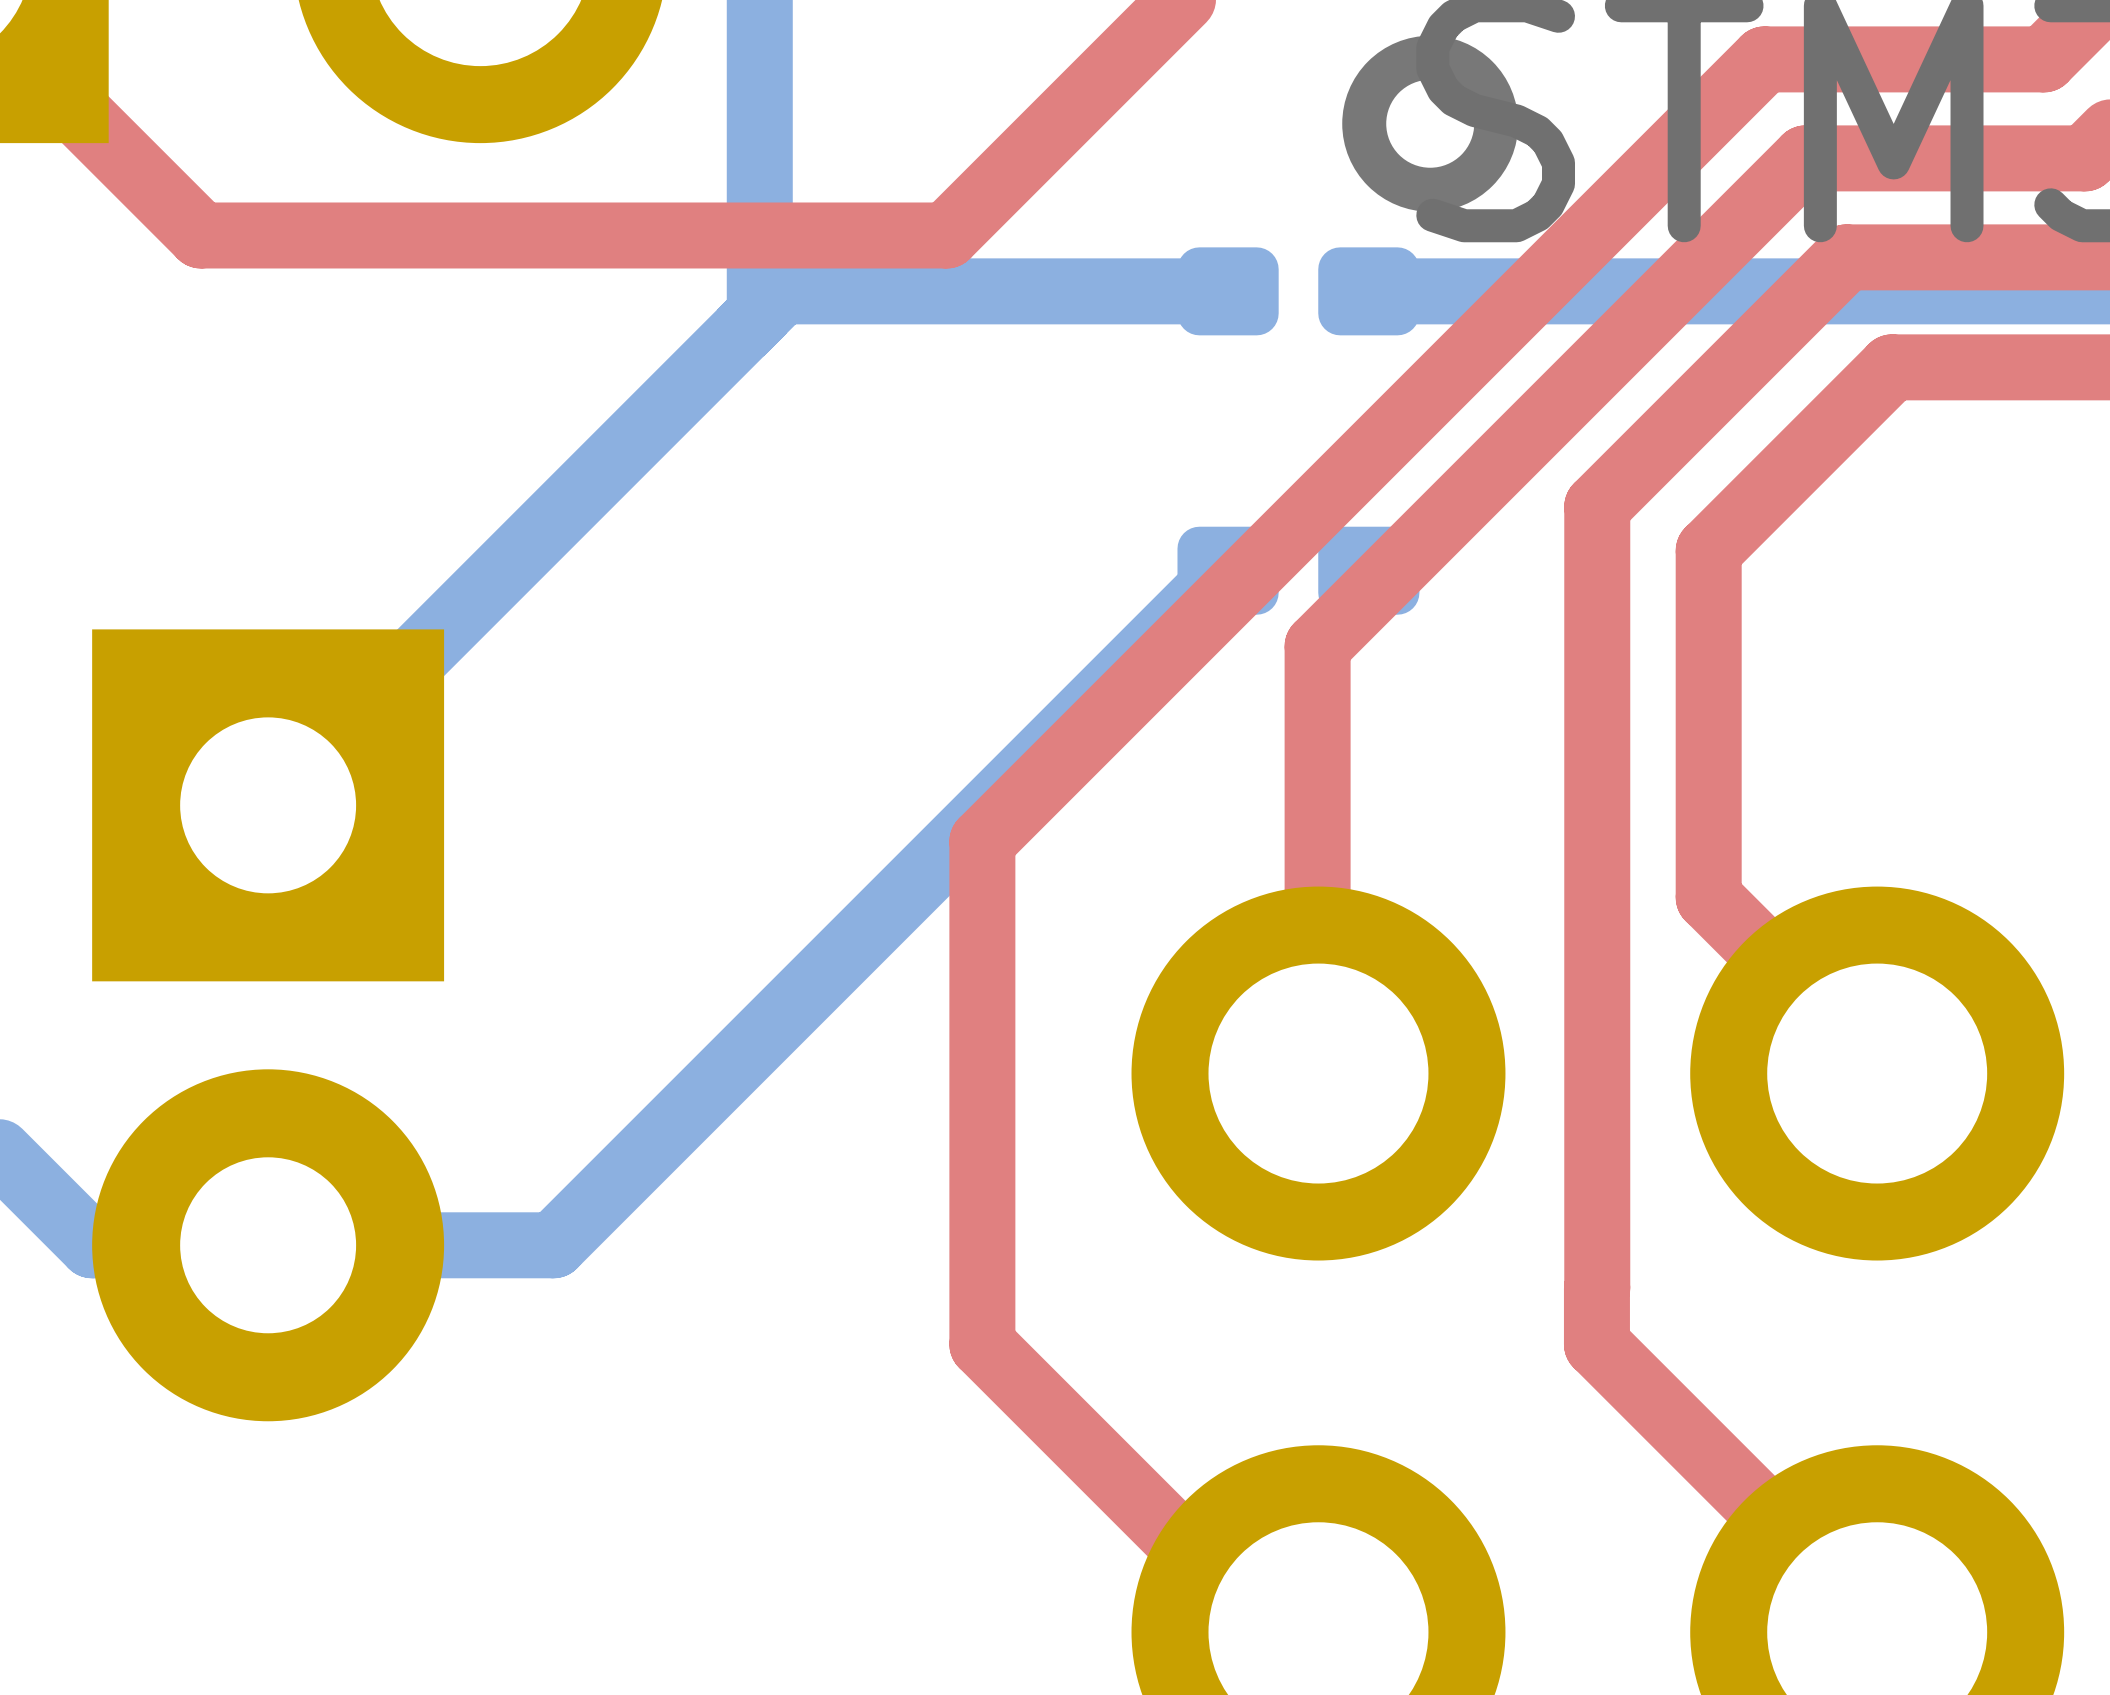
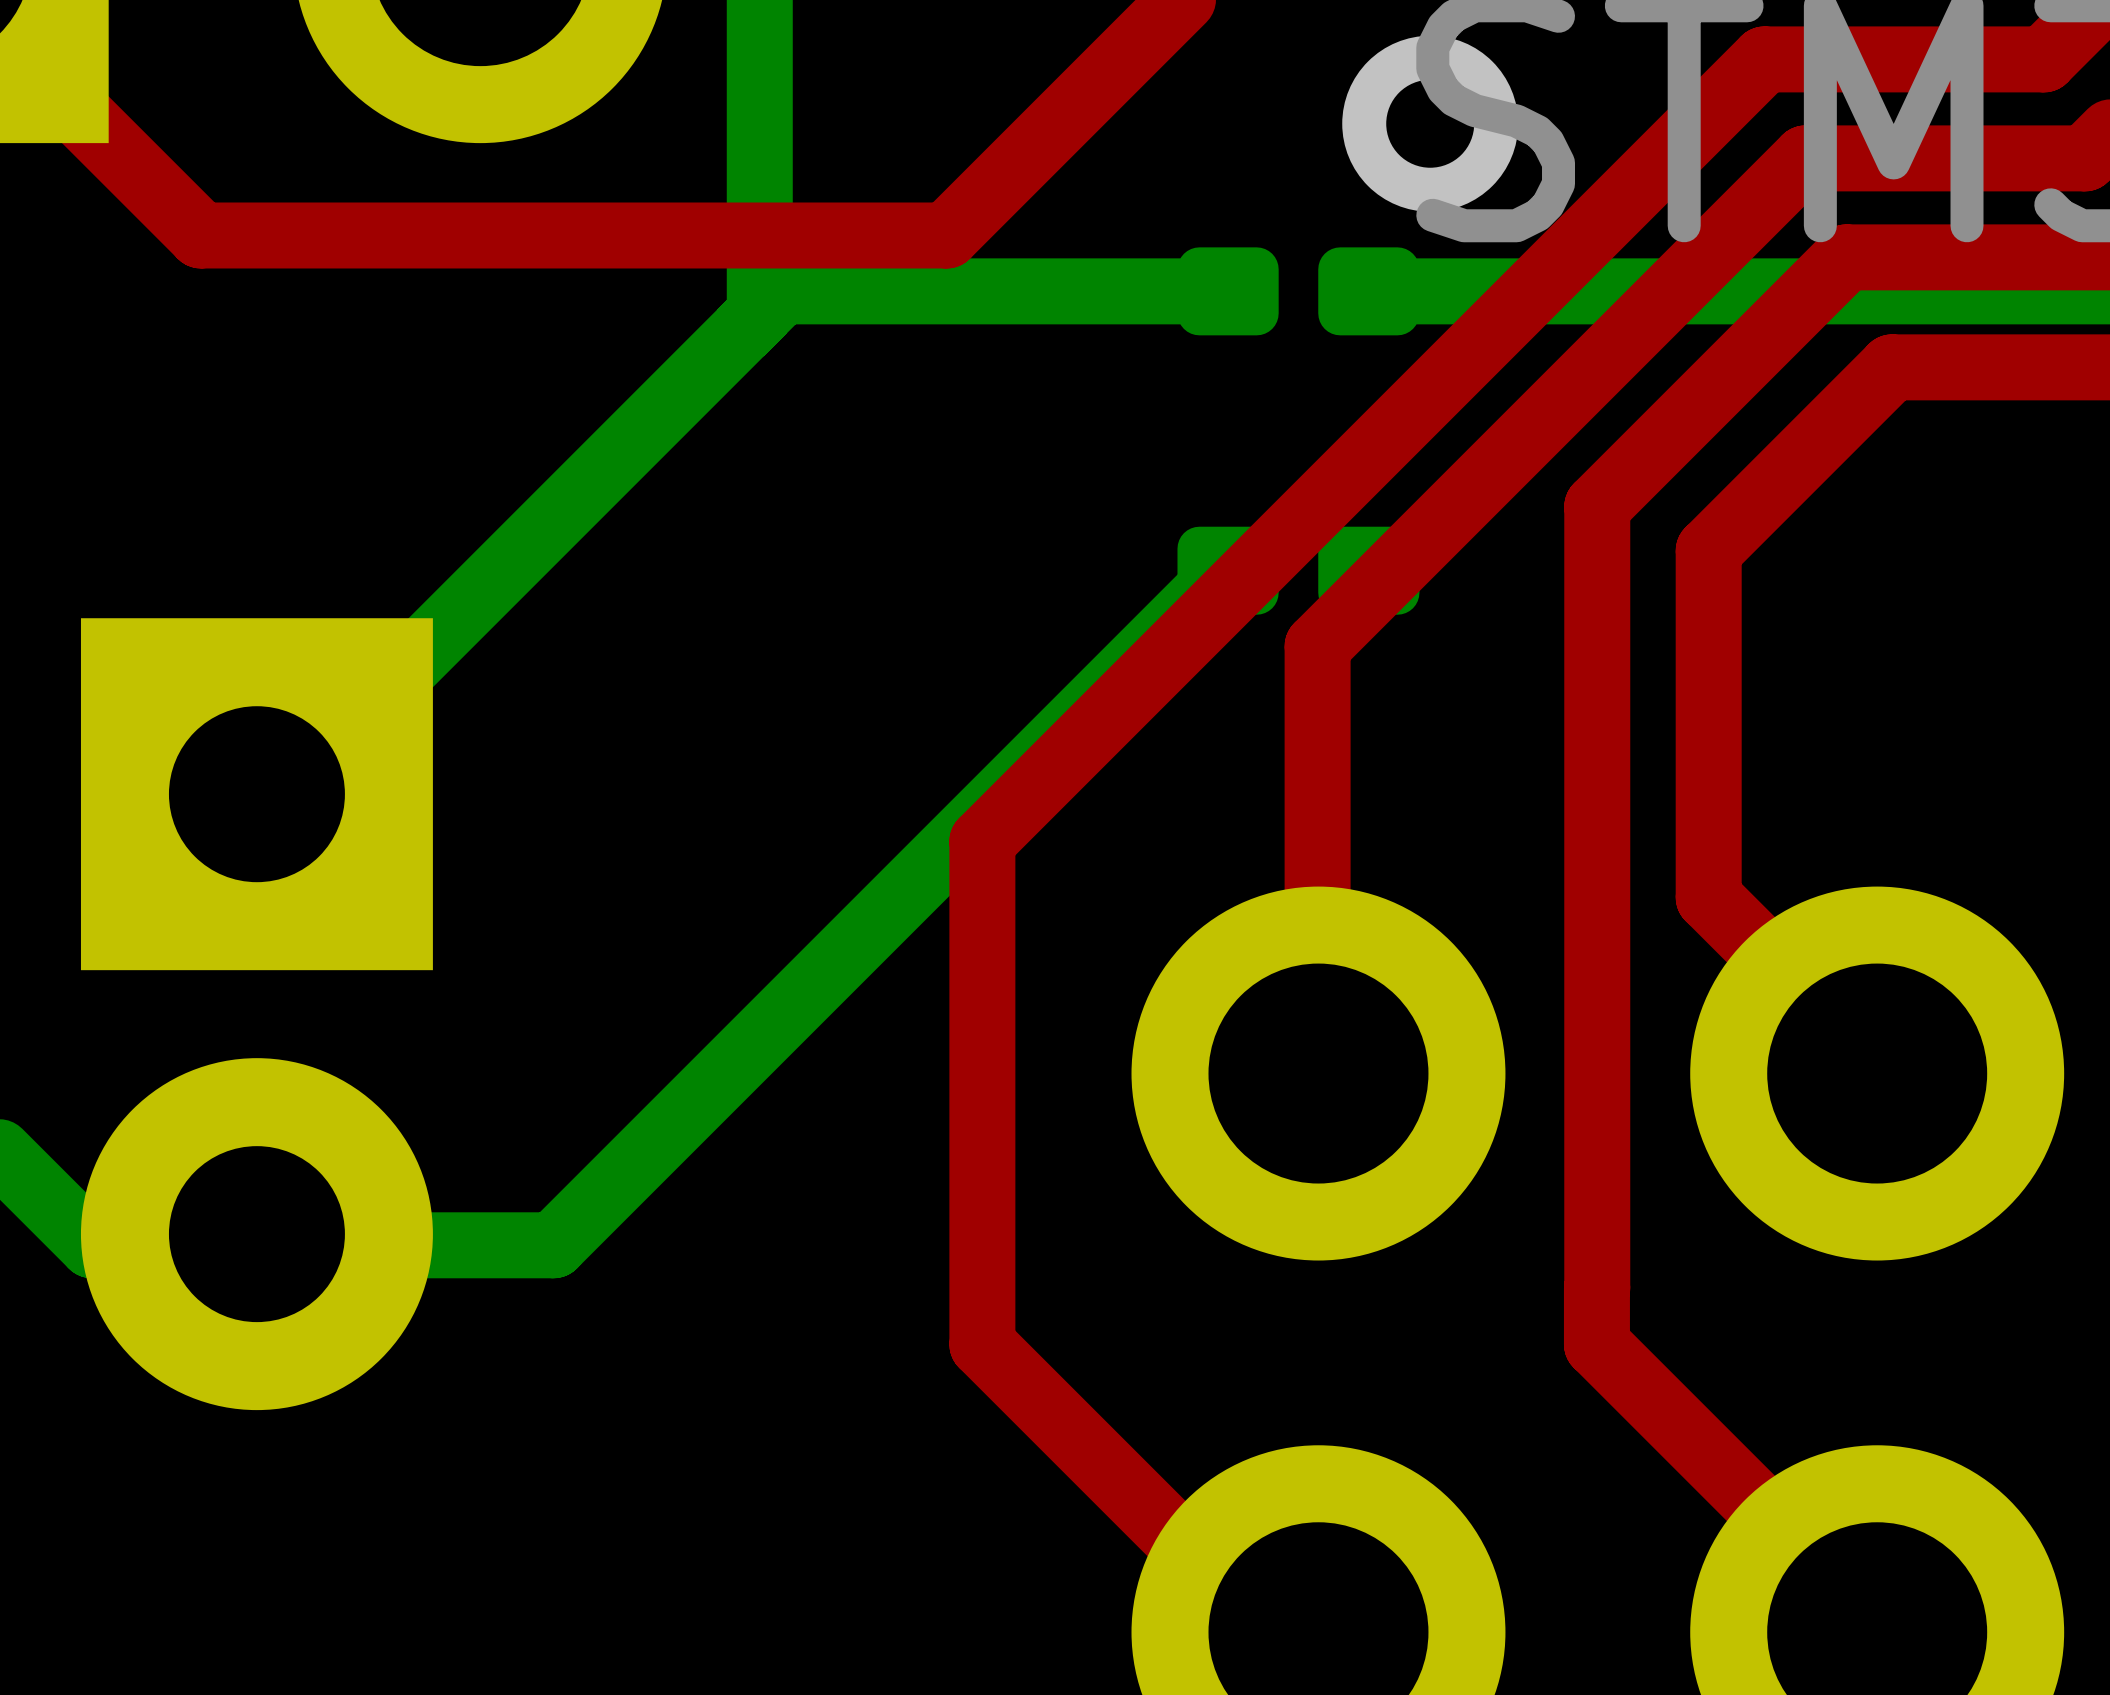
part position: (268, 1025) -> (256, 1014)

